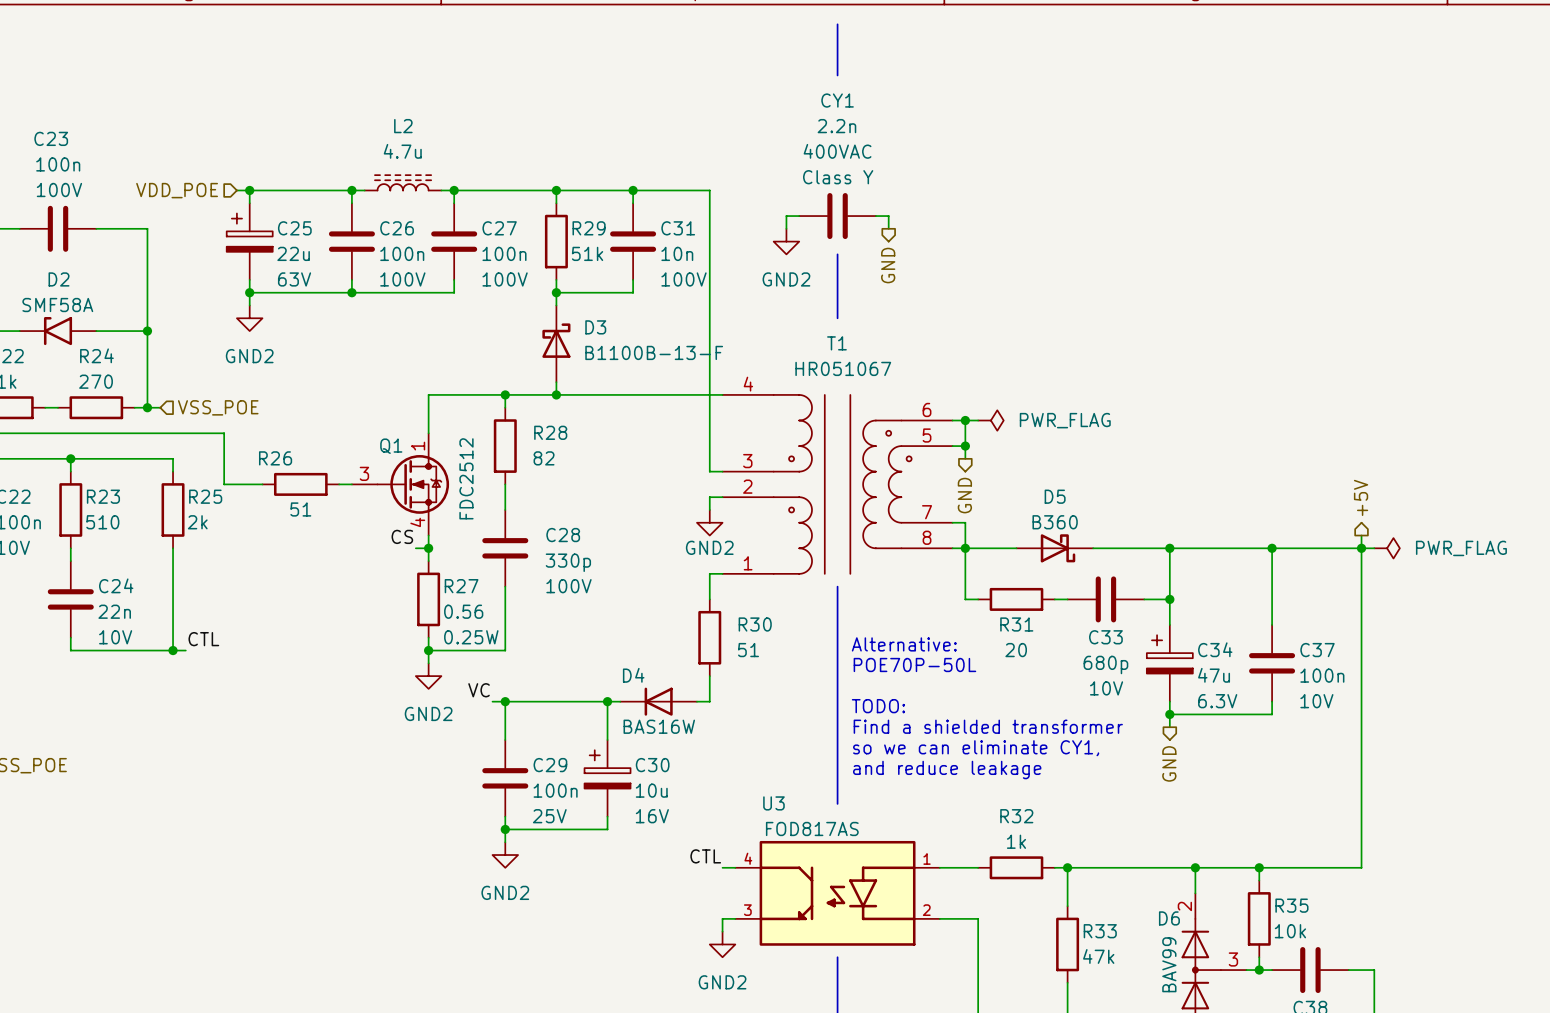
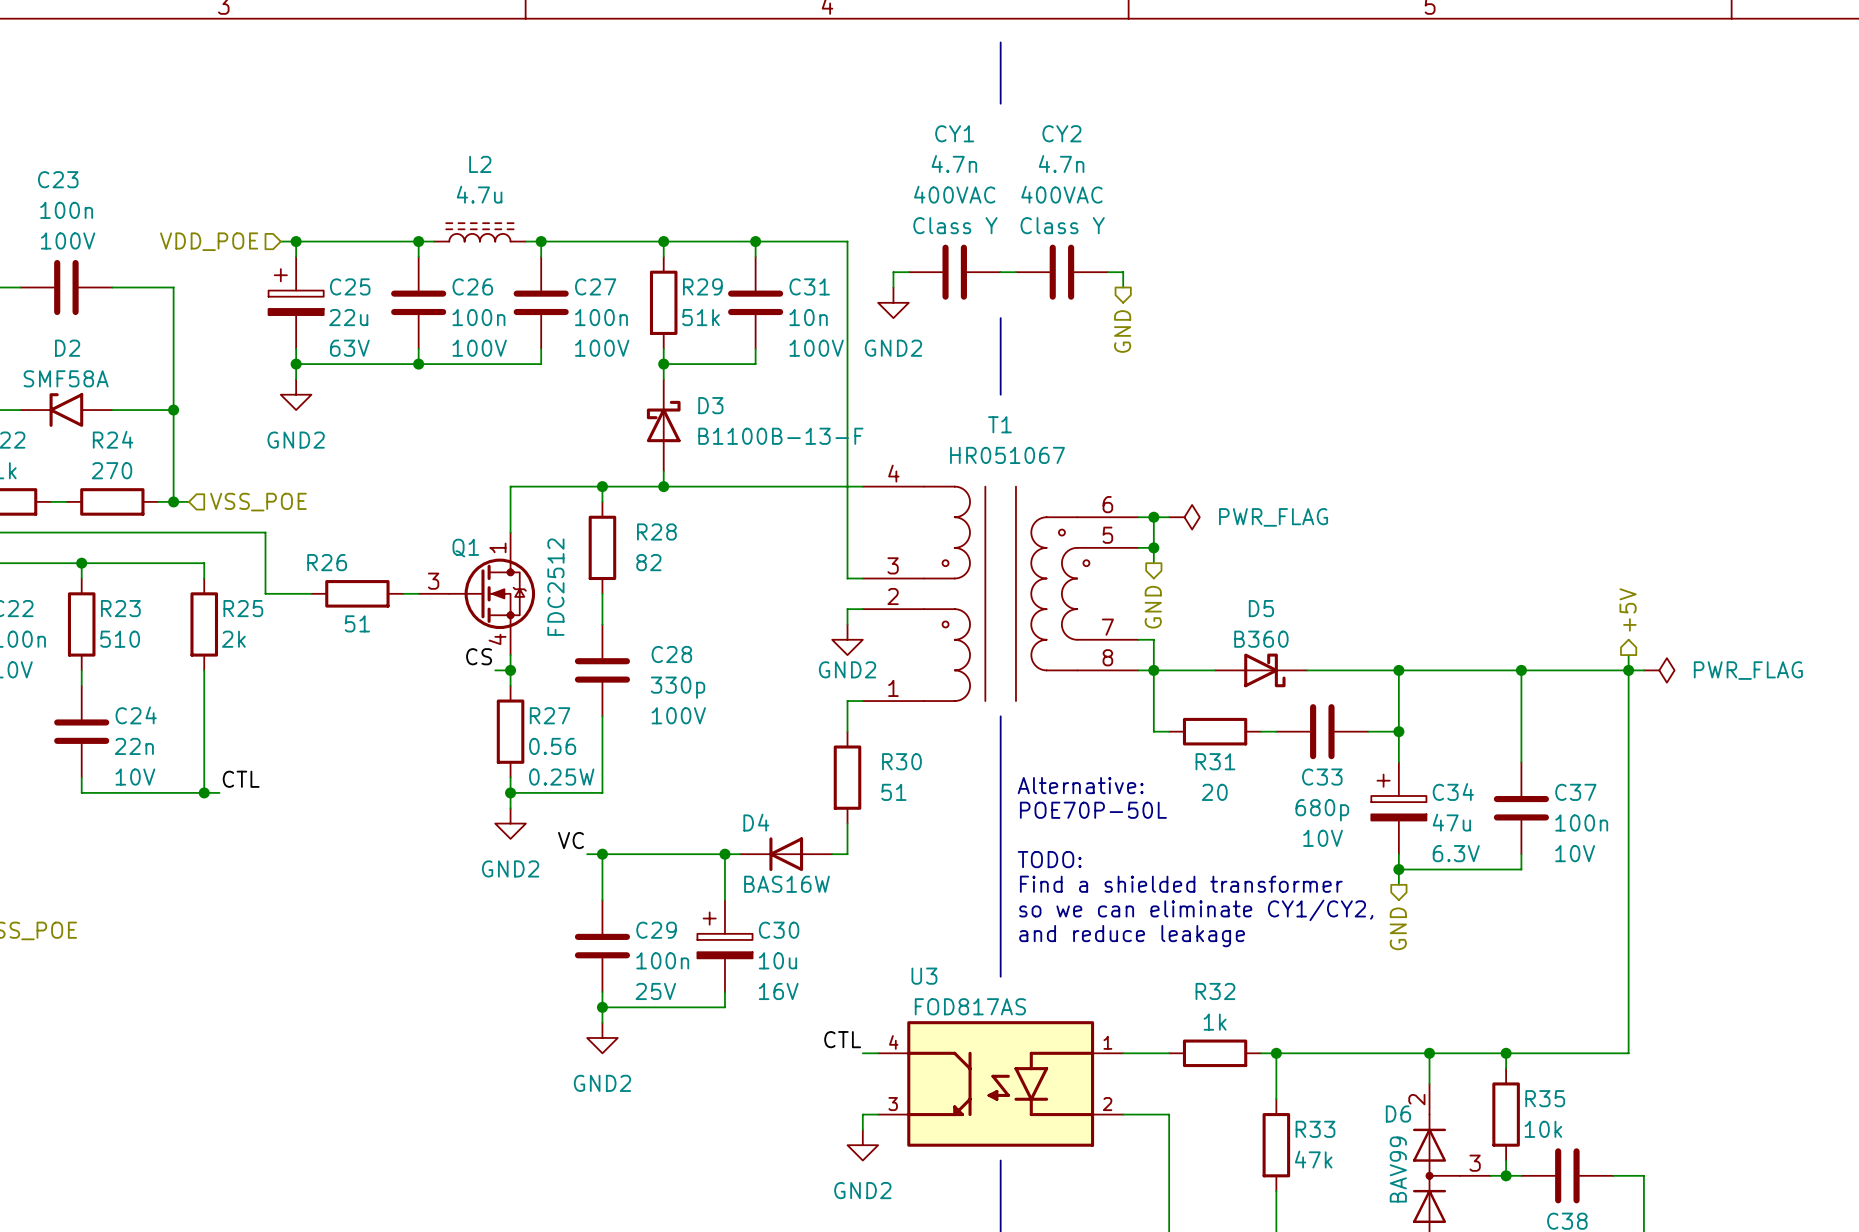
CY1 value: 2.2n (836, 126) -> 4.7n (954, 164)
wire: (799, 216) (786, 216) (786, 228) -> (908, 272) (893, 272) (893, 287)
CY1 position: (837, 216) -> (954, 272)
wire: (875, 216) (888, 216) (888, 228) -> (1107, 272) (1123, 272) (1123, 287)
CY2: none -> 4.7n (1061, 272)
power symbol position: GND2 (786, 241) -> GND2 (893, 302)
hierarchical label position: GND (888, 265) -> GND (1122, 331)
text: so we can eliminate CY1, (976, 748) -> so we can eliminate CY1/CY2, (1196, 910)

